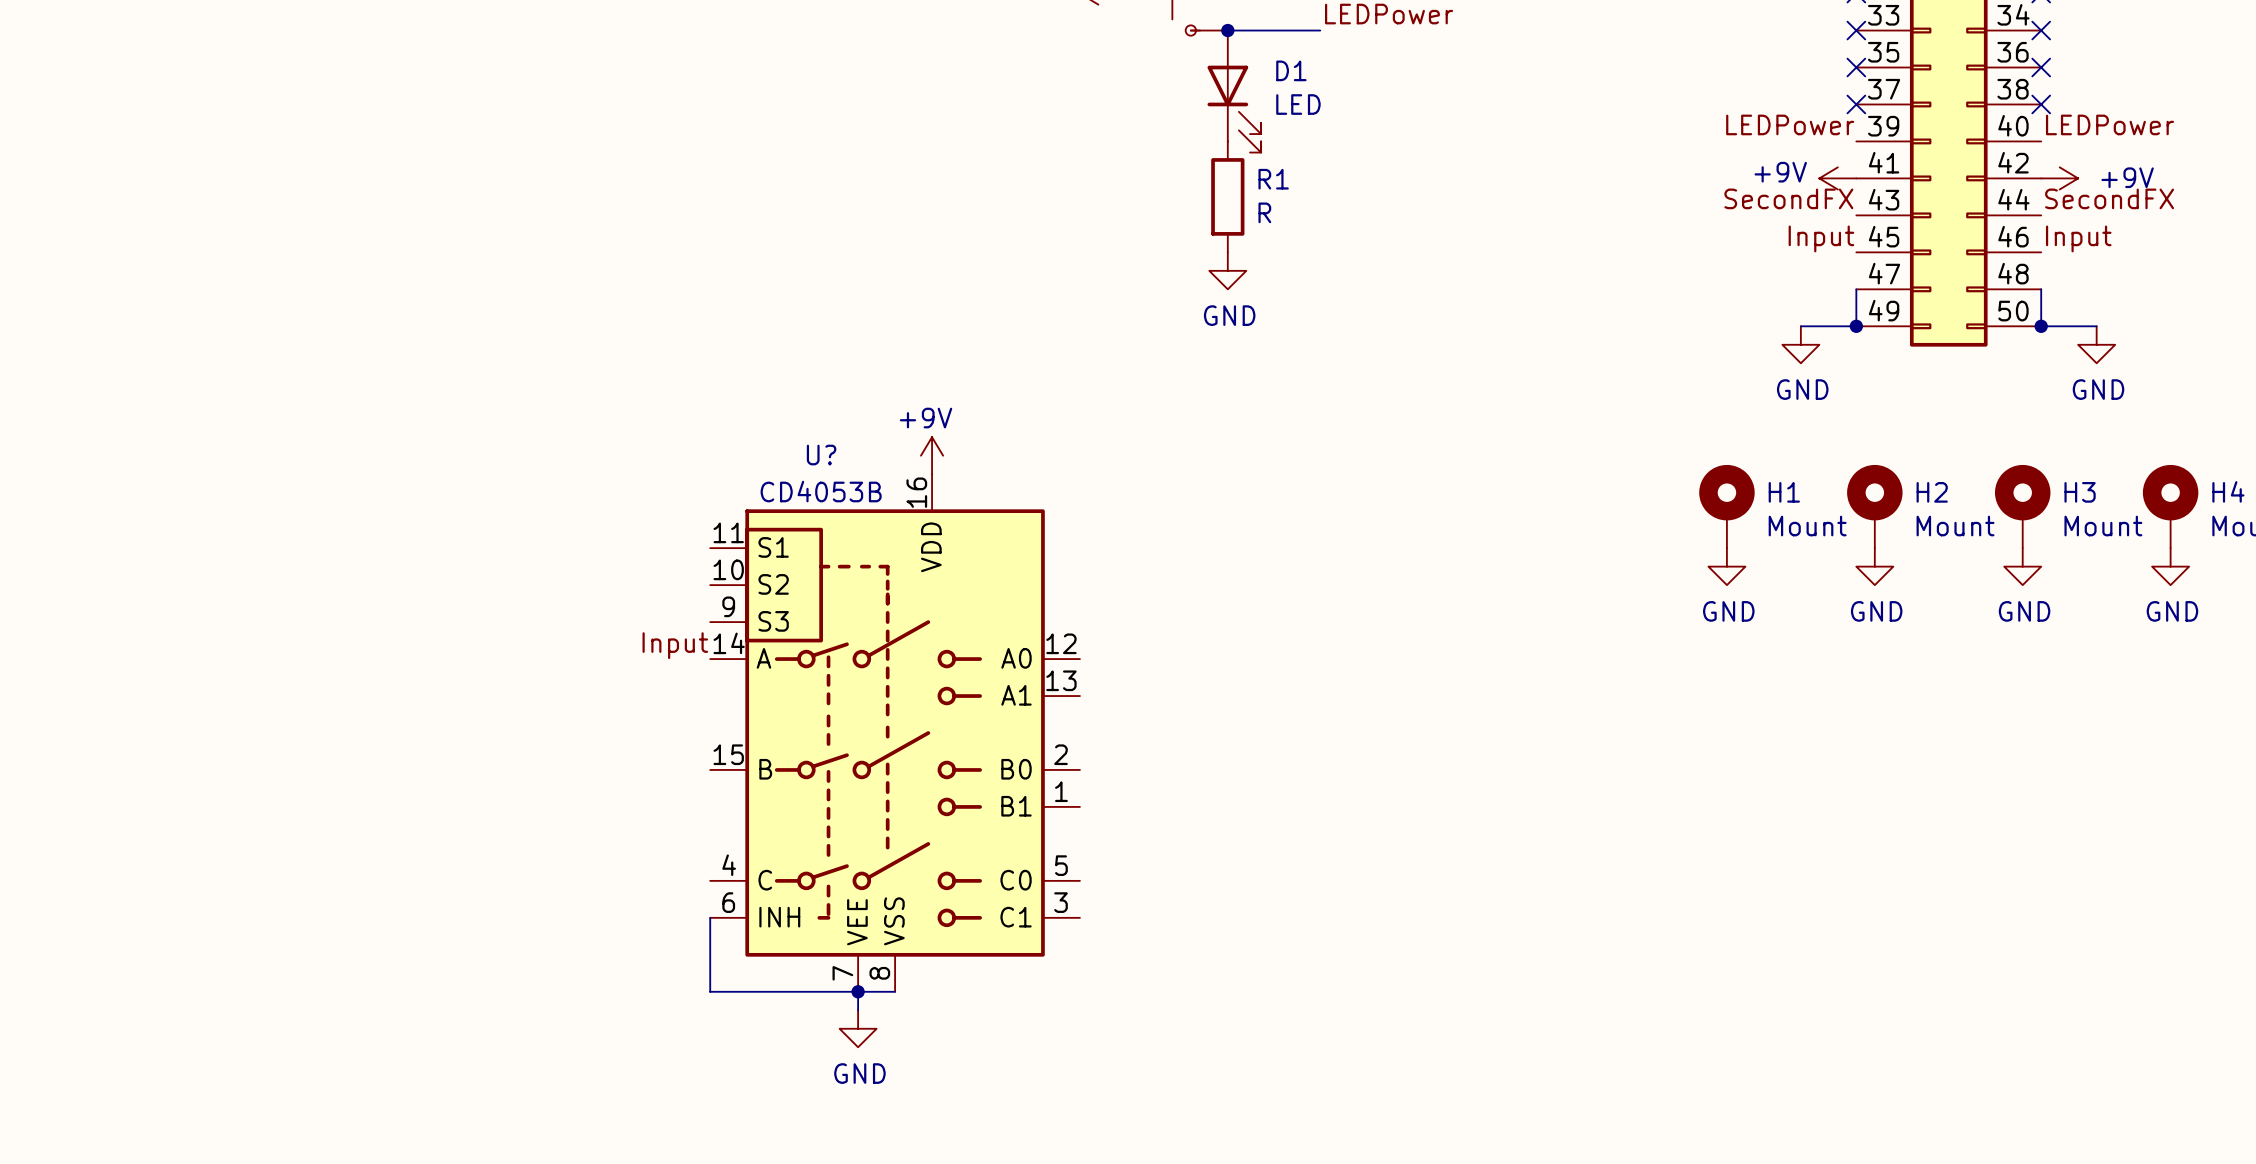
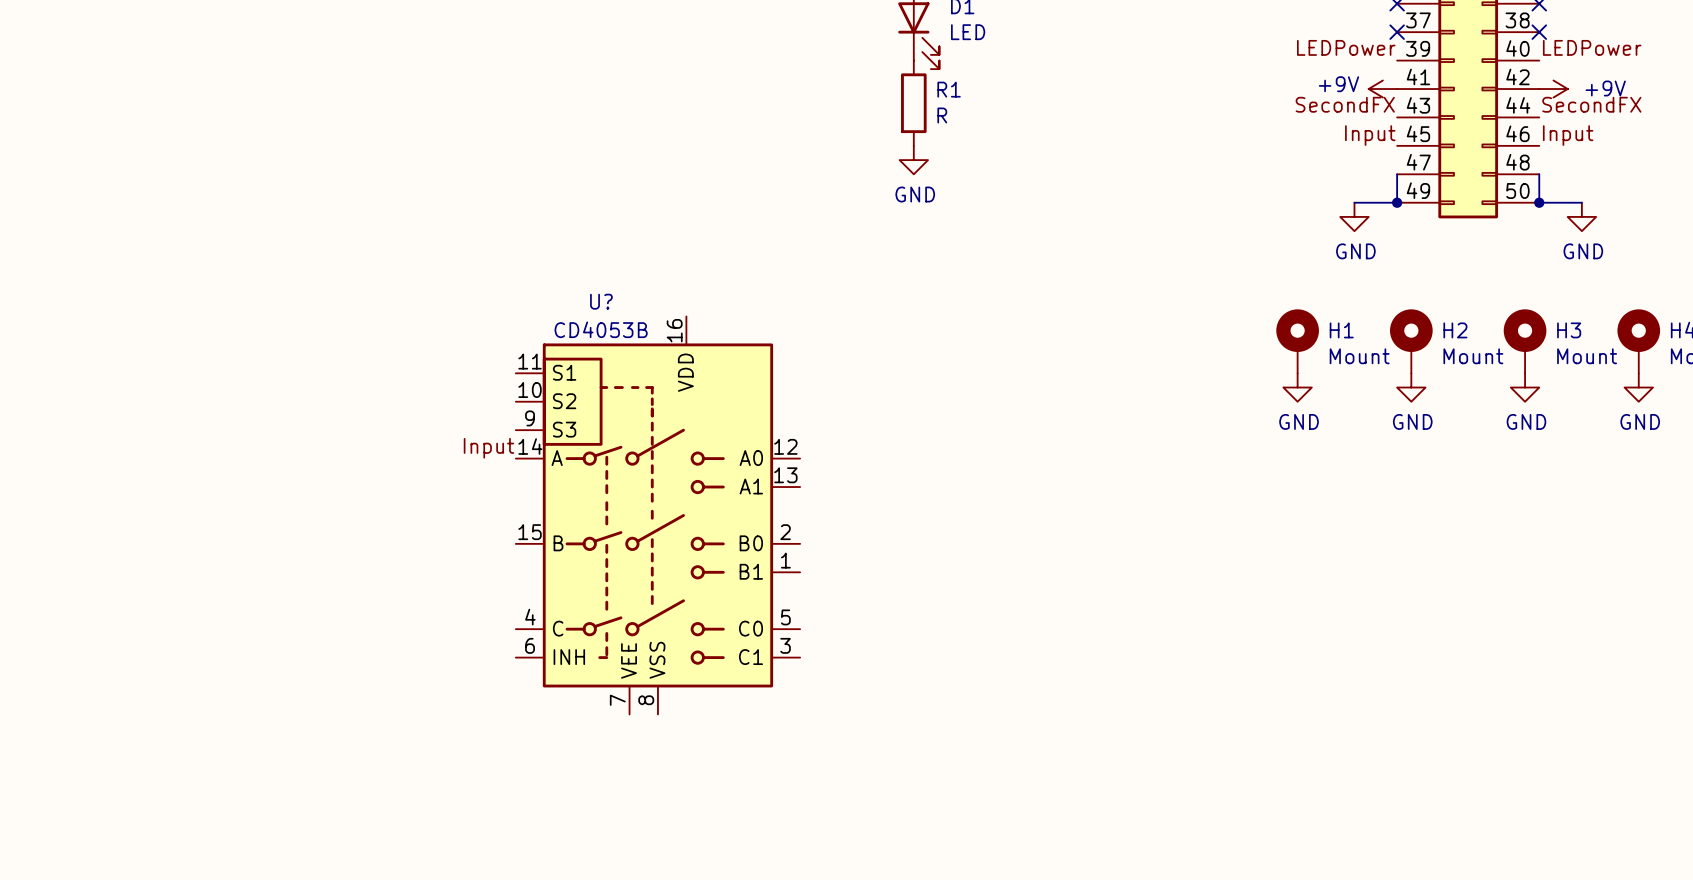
power symbol: +9V (932, 455) -> none
wire: (710, 917) (710, 991) (895, 991) -> none
wire: (858, 991) (858, 1010) -> none
junction: (858, 991) -> none
power symbol: GND (858, 1028) -> none

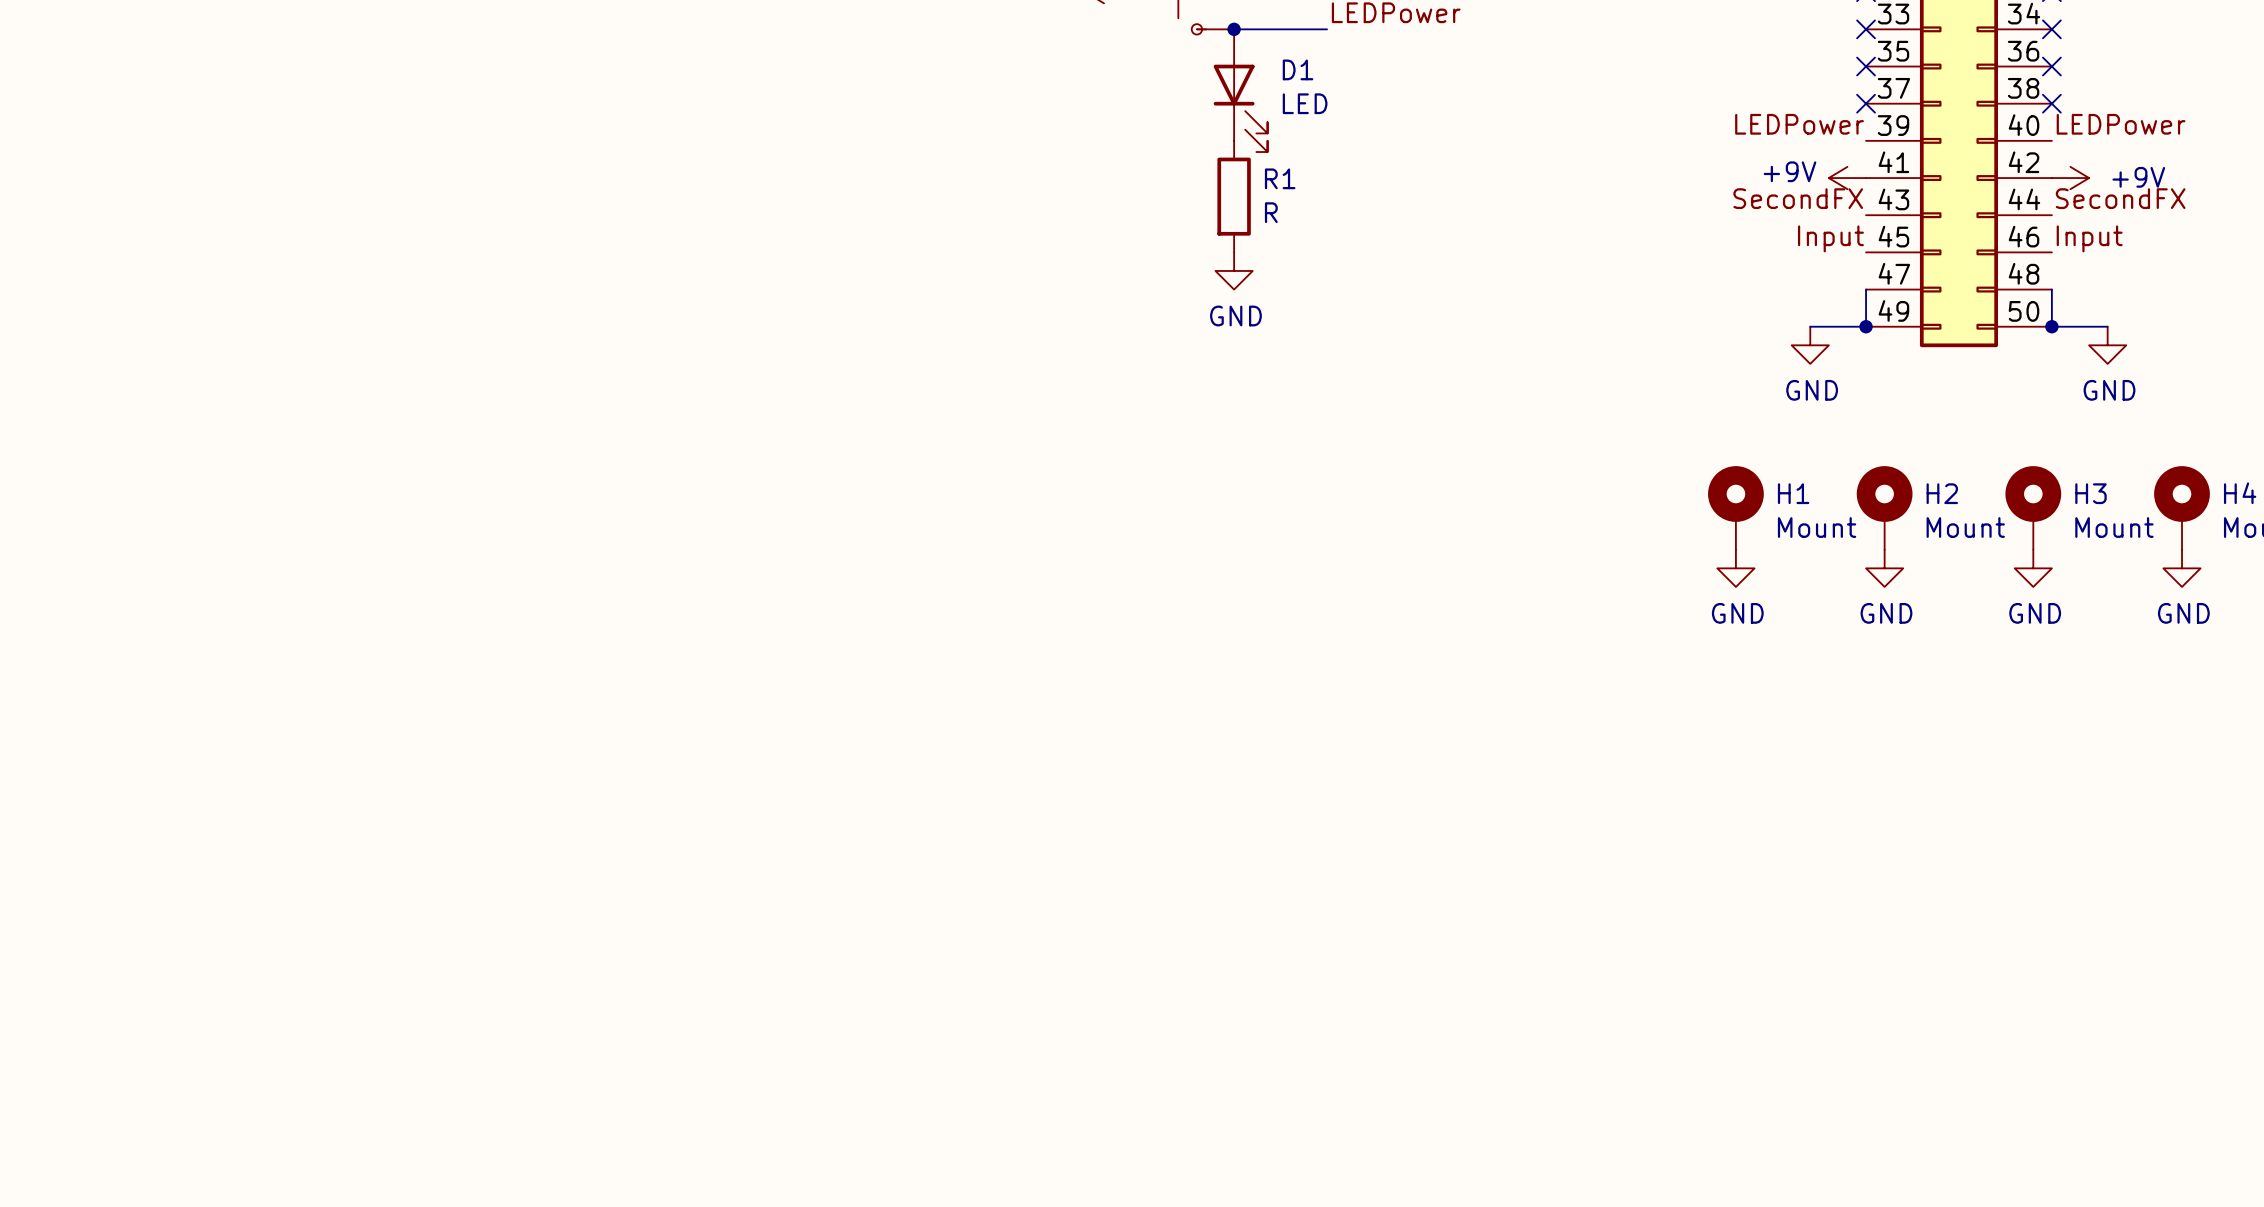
label: Input (488, 448) -> none
U?: CD4053B (657, 515) -> none

